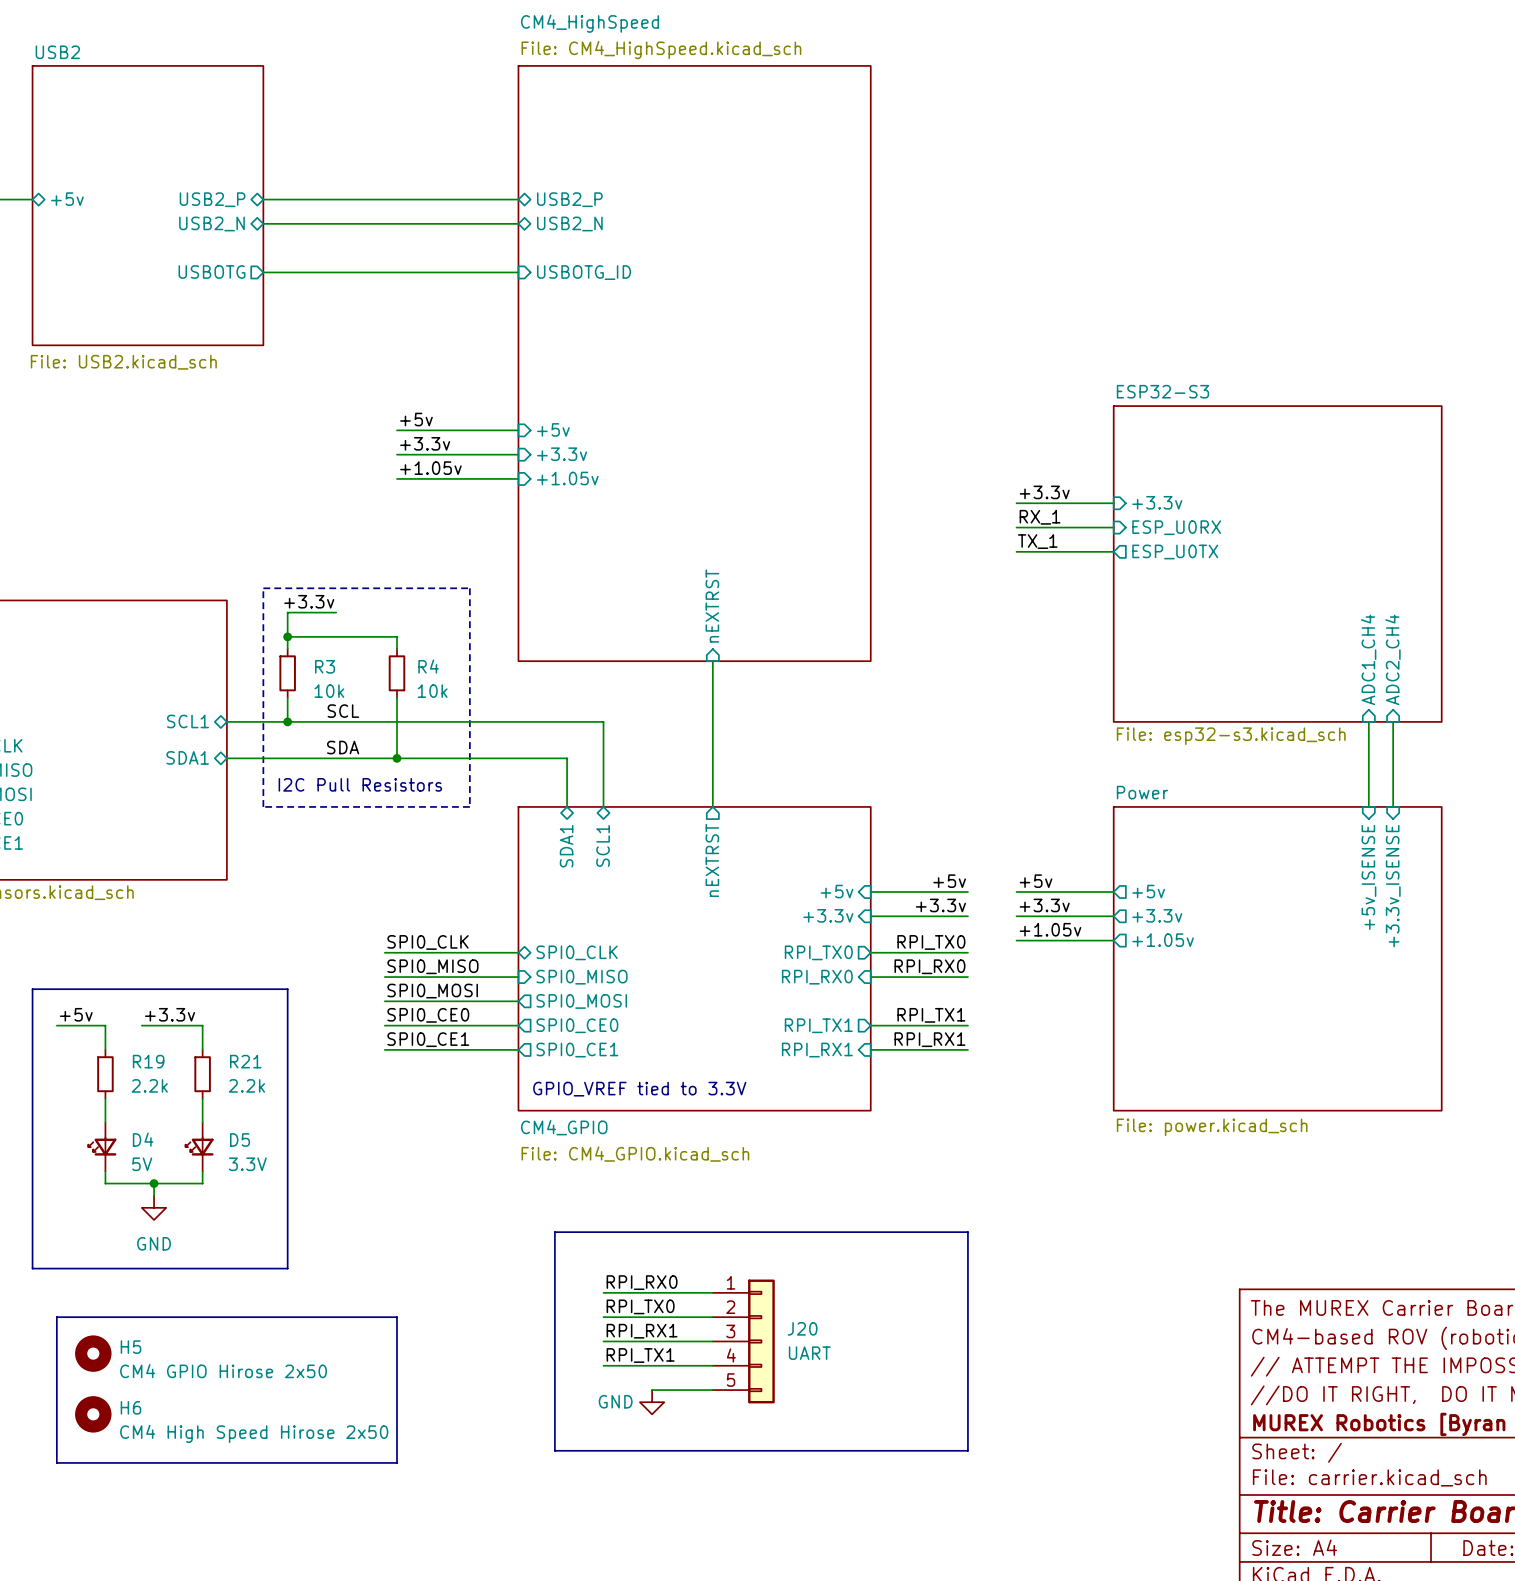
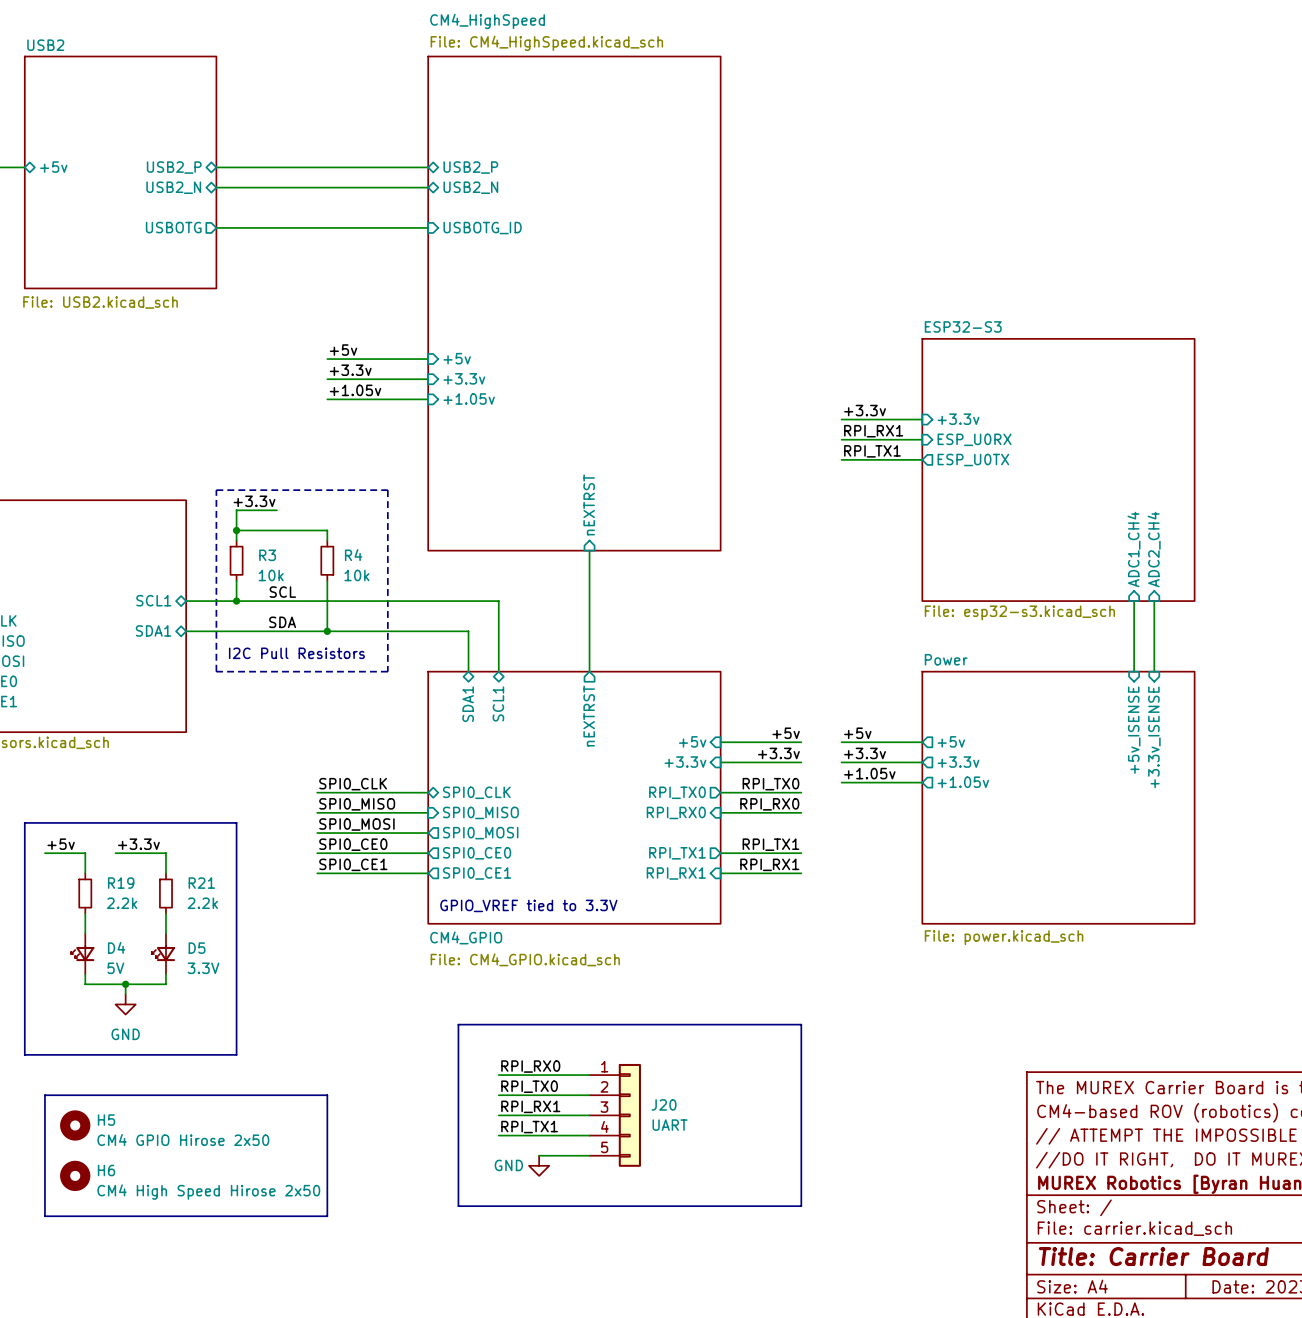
label: RX_1 (1040, 517) -> RPI_RX1 (873, 431)
label: TX_1 (1037, 541) -> RPI_TX1 (872, 451)

